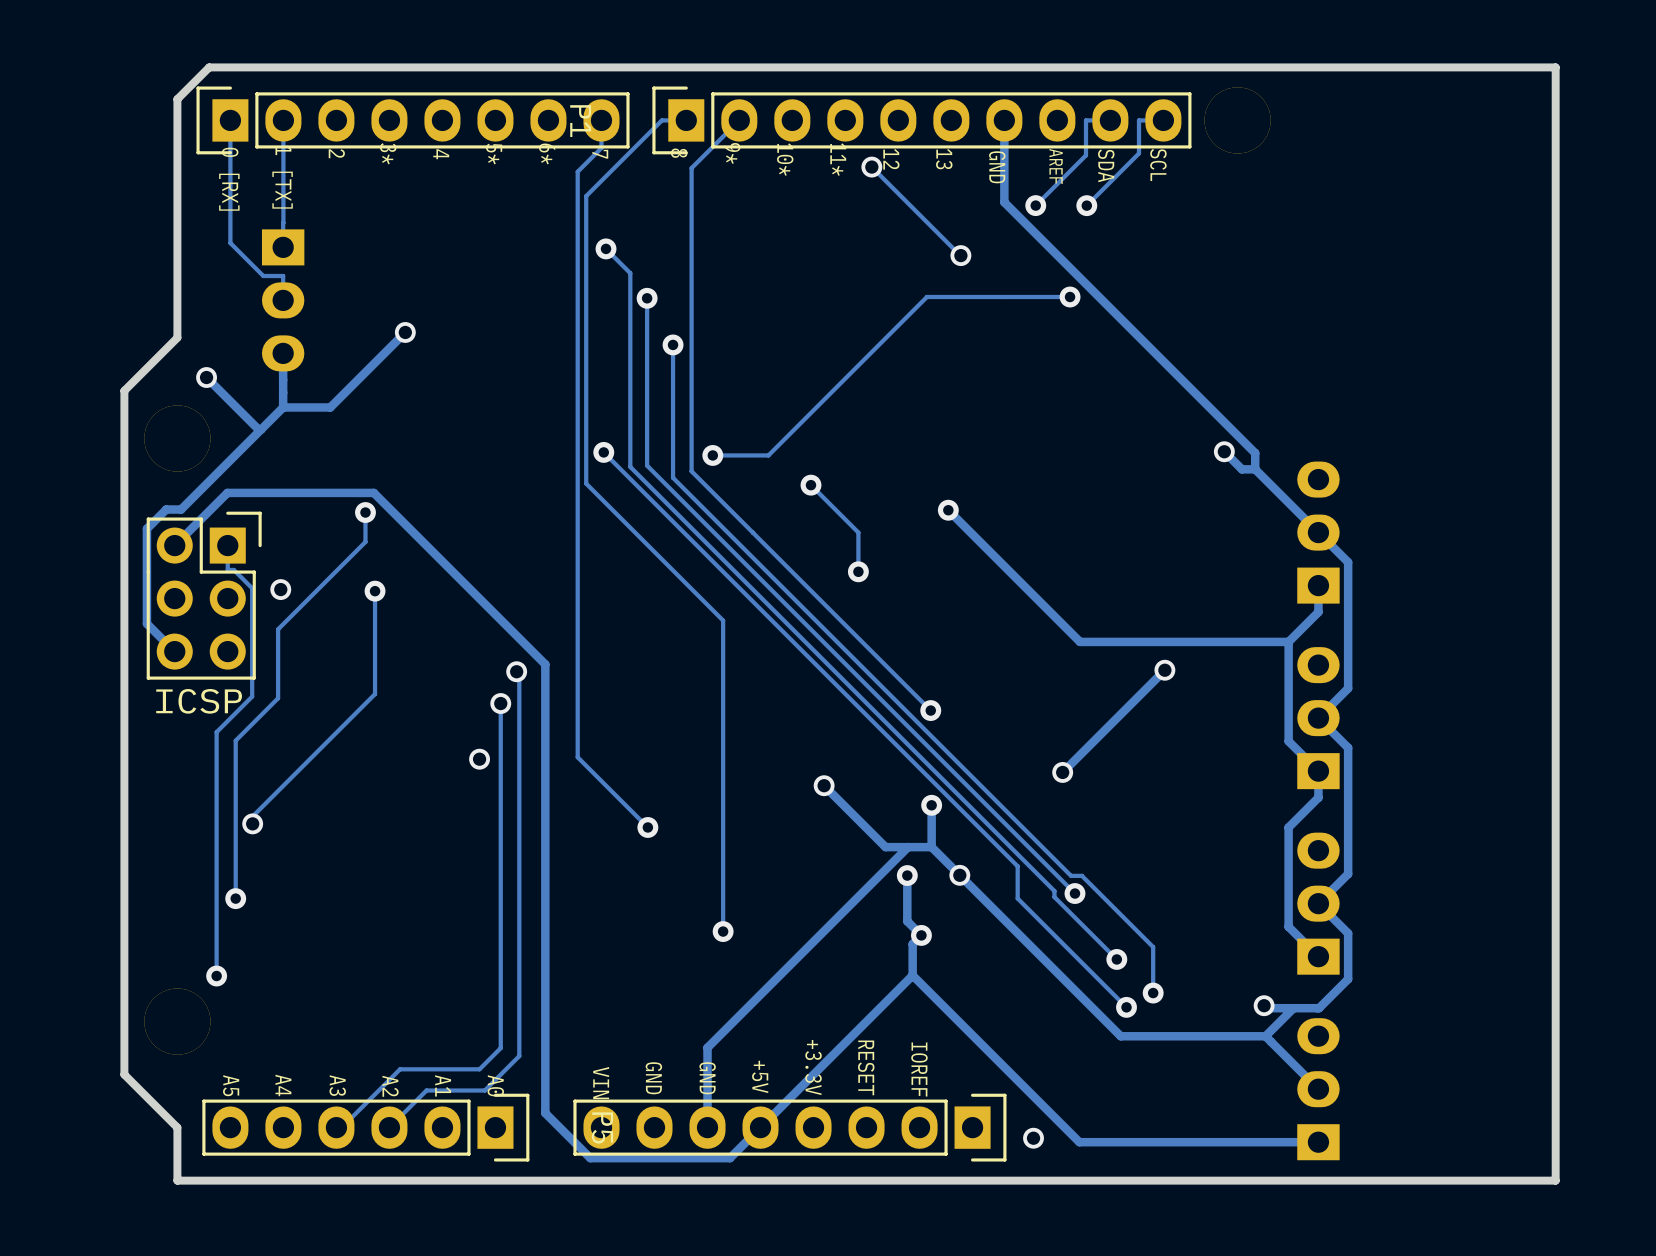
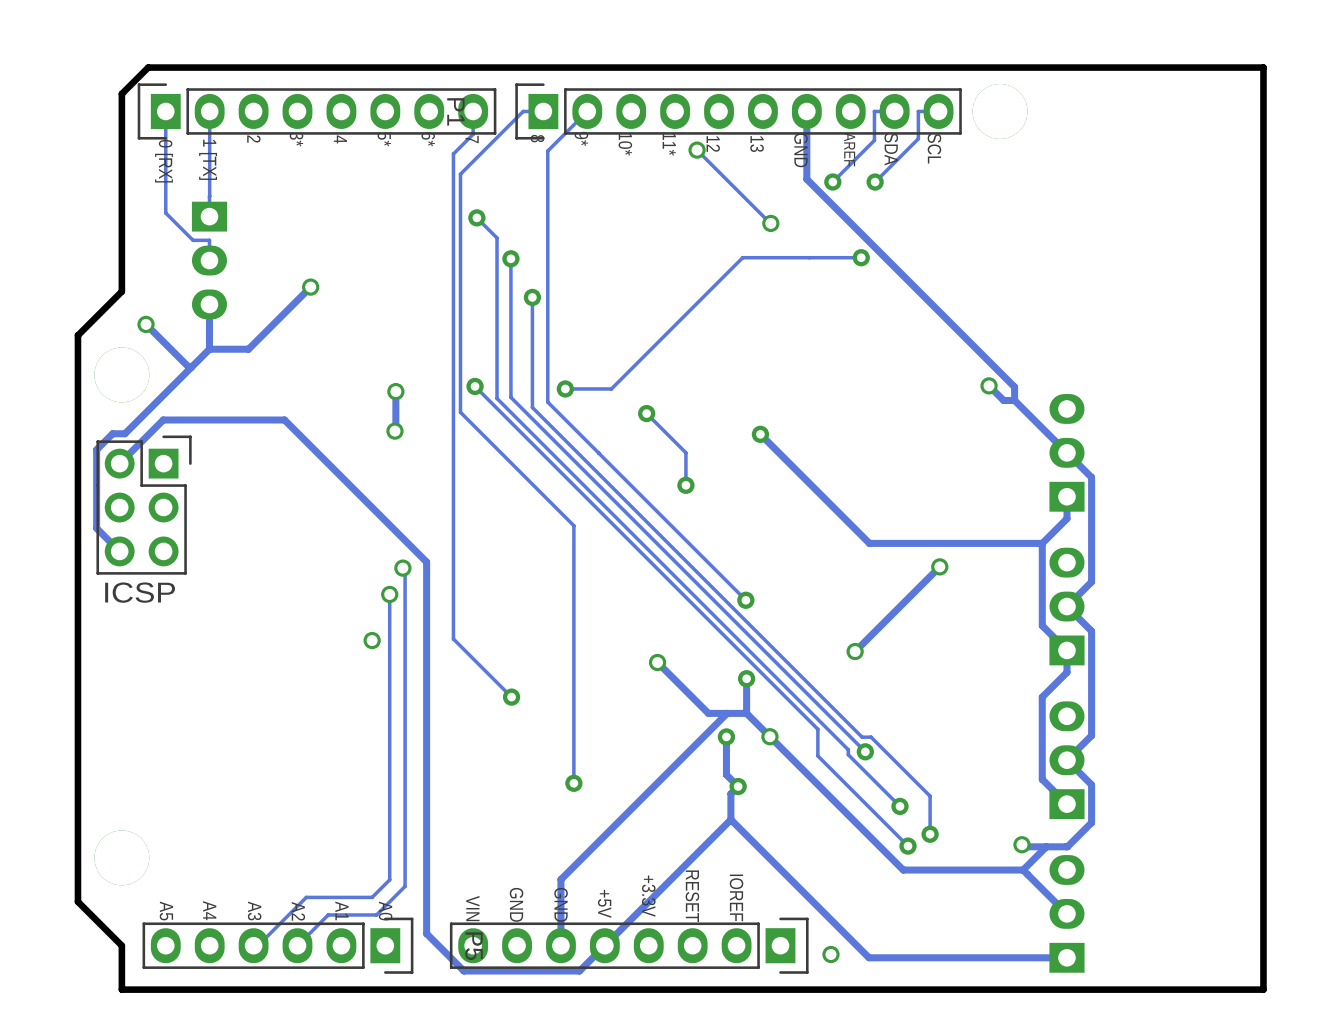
track: none -> (395, 391) (394, 431)
via: none -> (395, 391)
via: none -> (394, 431)
track: (365, 512) (365, 541) (278, 629) (278, 698) (235, 740) (235, 898) -> none
via: (365, 512) -> none
track: (227, 545) (227, 569) (233, 569) (252, 588) (252, 696) (216, 732) (216, 976) -> none
via: (280, 589) -> none
track: (375, 591) (375, 694) (252, 816) (252, 823) -> none
via: (375, 591) -> none
via: (252, 823) -> none
via: (235, 898) -> none
via: (216, 976) -> none

